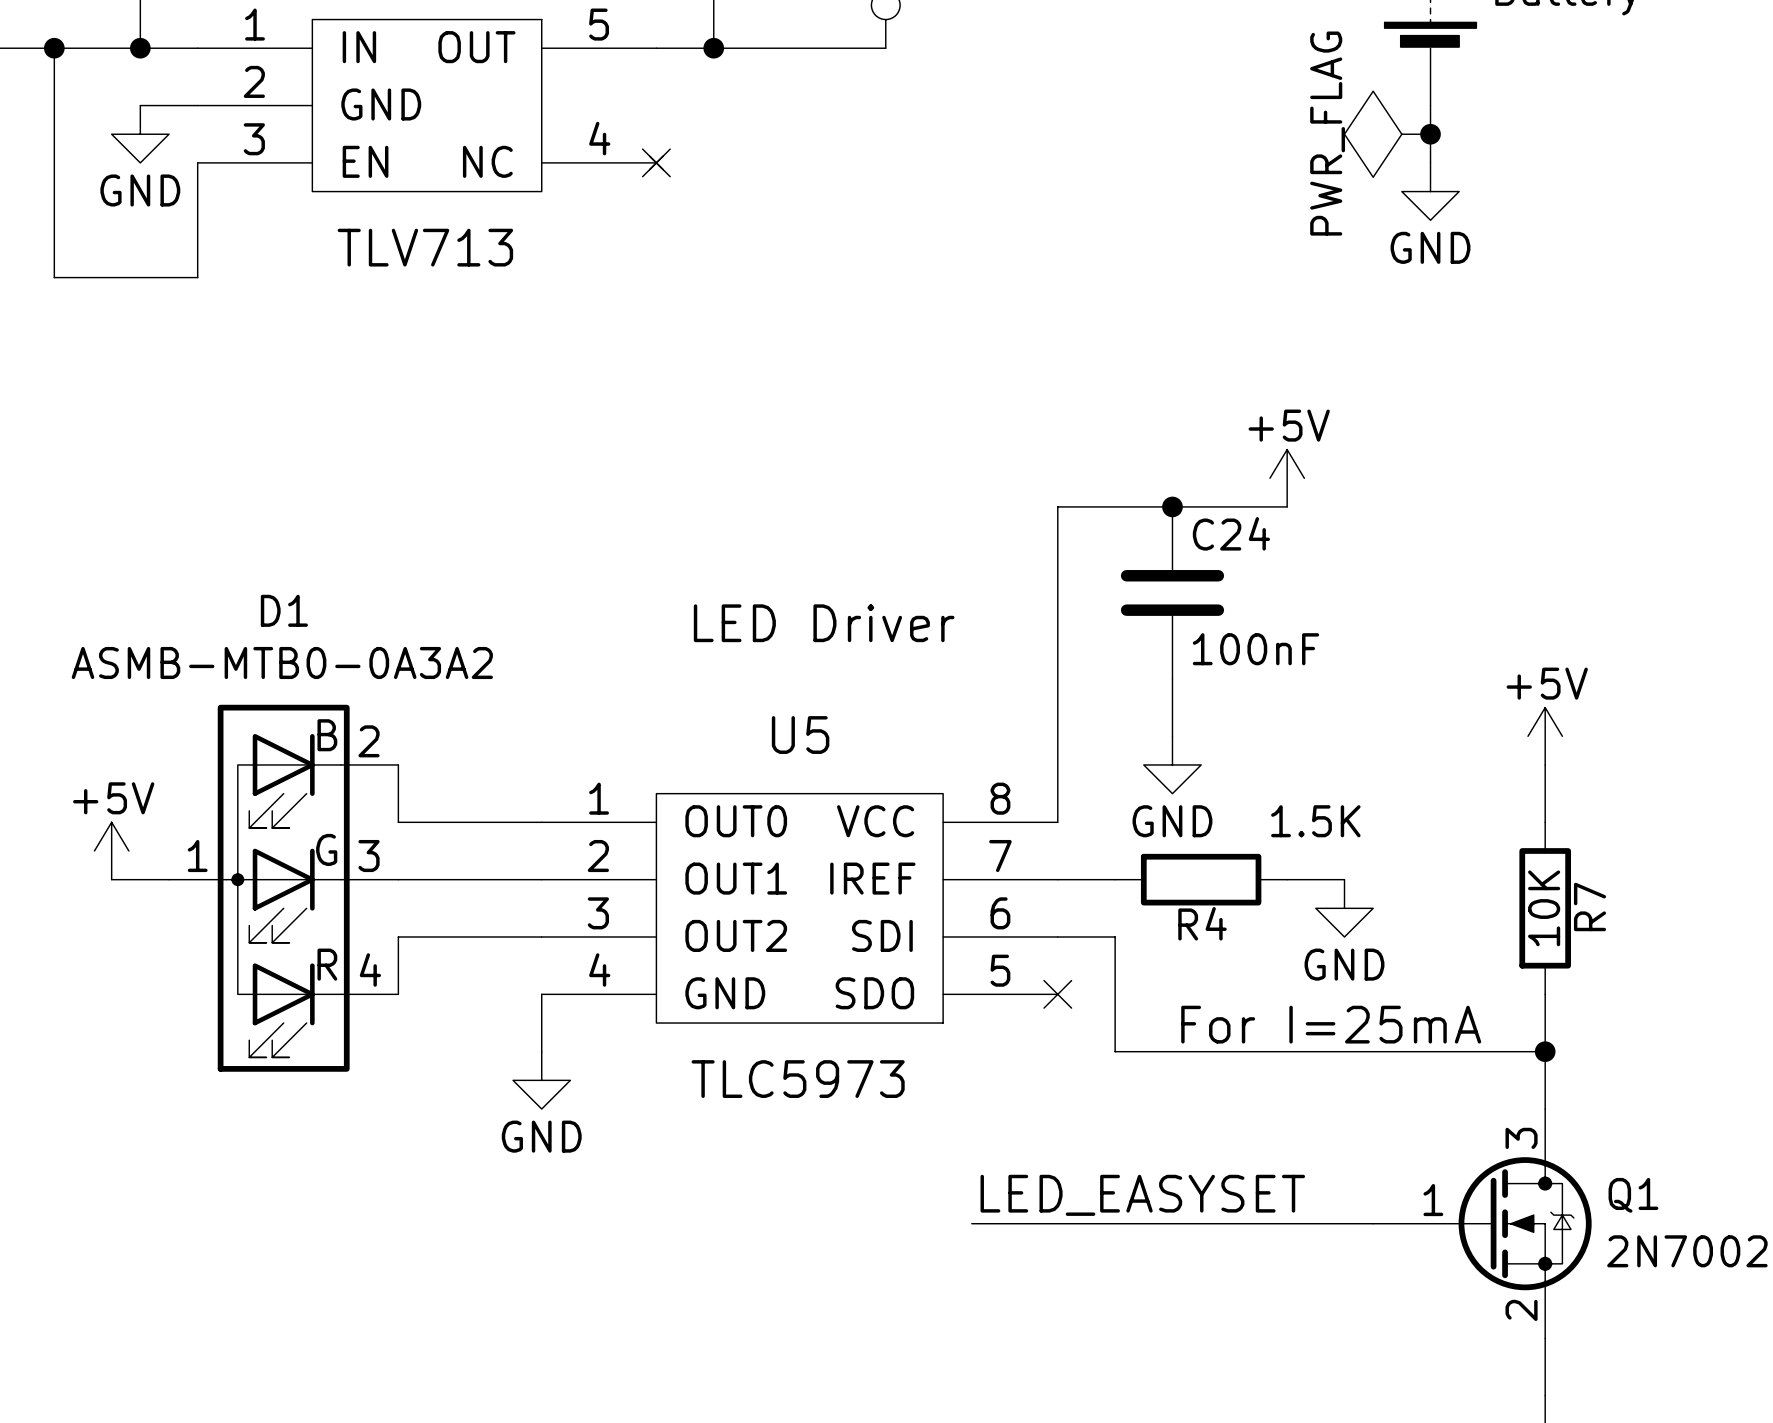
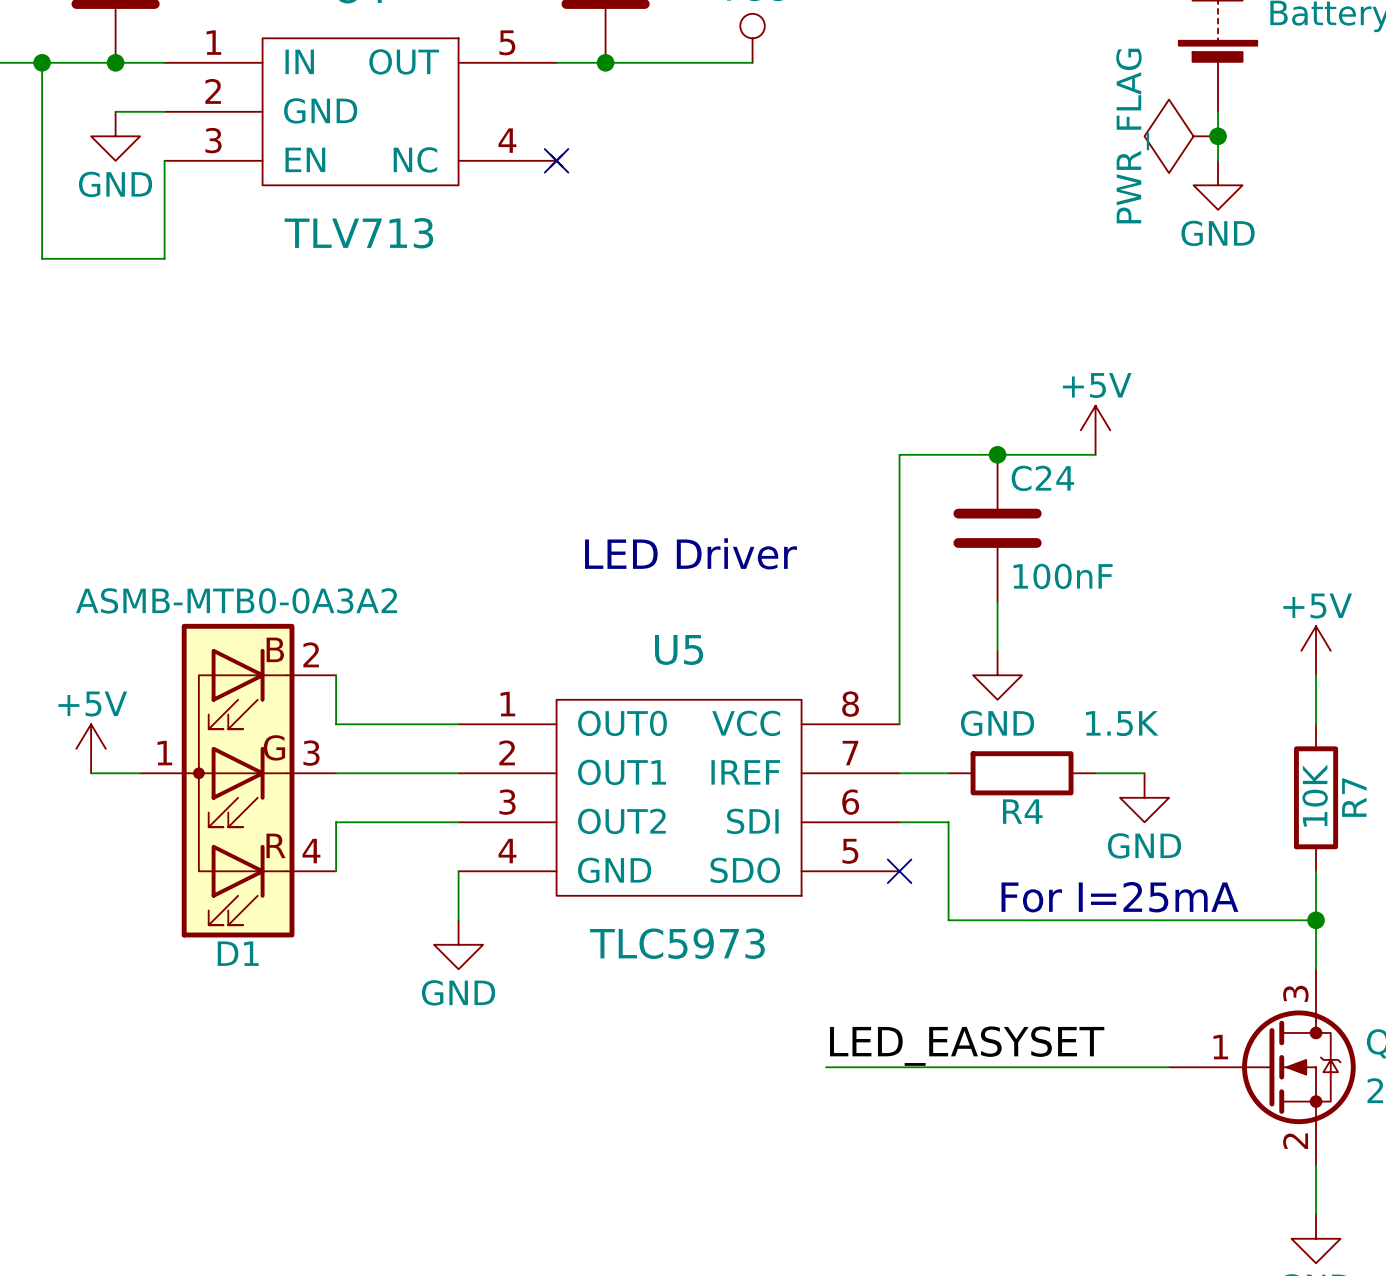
D1 name position: D1 (284, 610) -> D1 (238, 953)
D1 value position: ASMB-MTB0-0A3A2 (282, 662) -> ASMB-MTB0-0A3A2 (236, 600)

